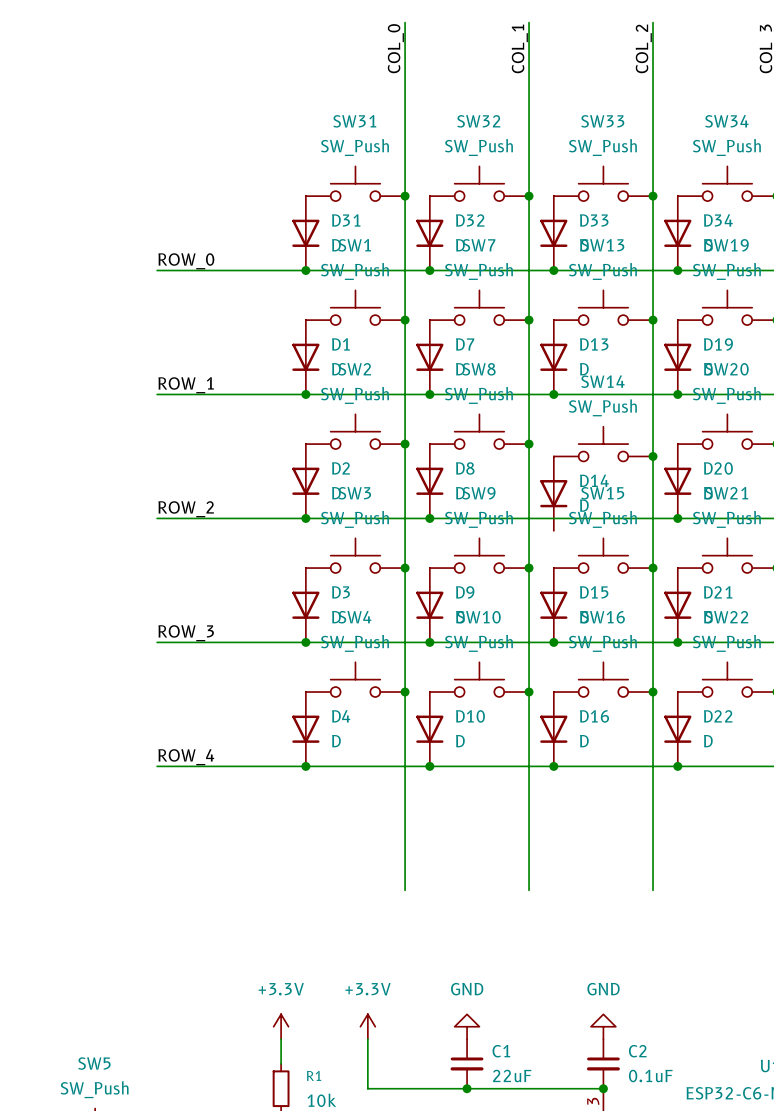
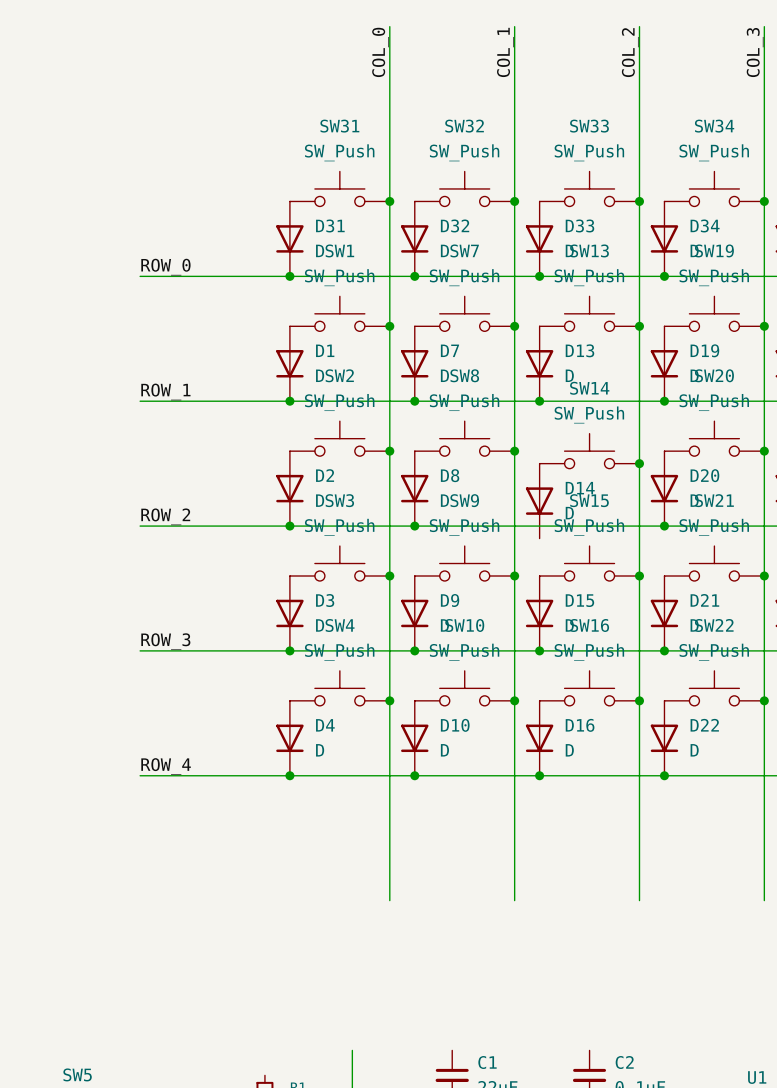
power symbol: +3.3V (281, 1026) -> none
power symbol: +3.3V (367, 1026) -> none
power symbol: GND (467, 1026) -> none
power symbol: GND (603, 1026) -> none
wire: (281, 1039) (281, 1063) -> none

